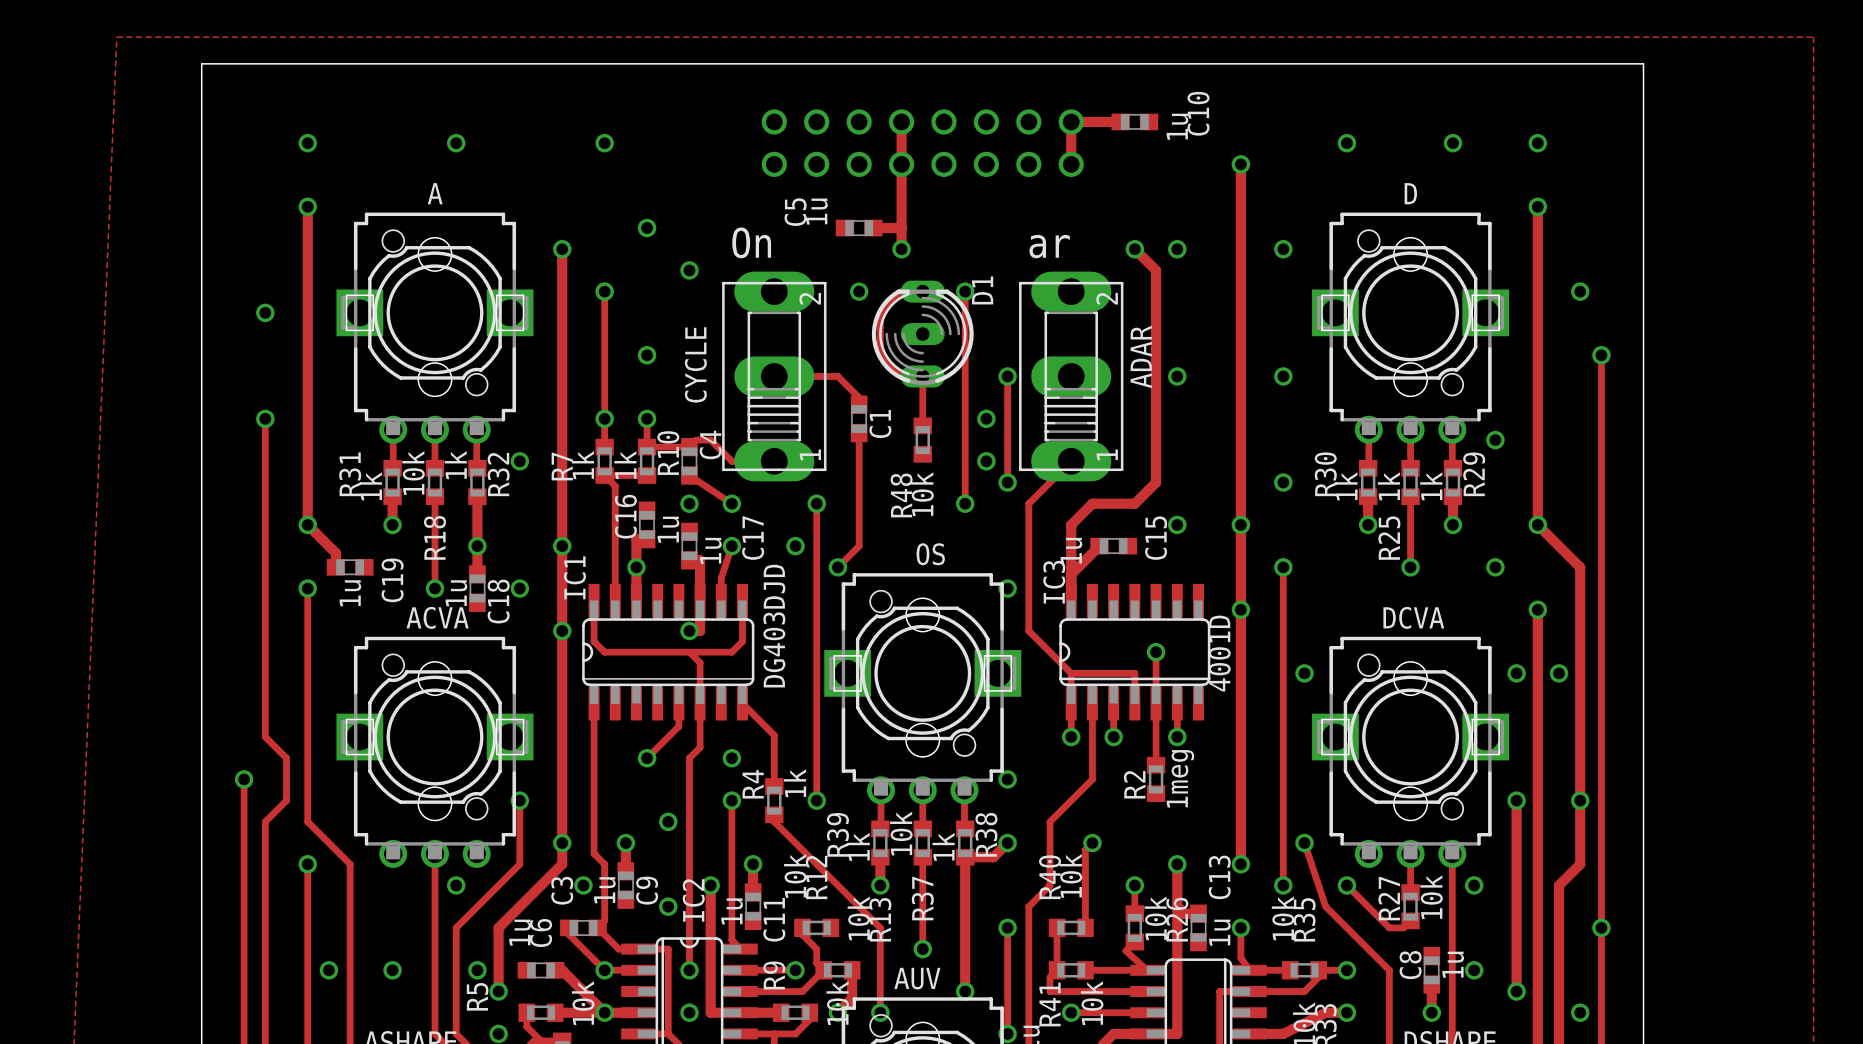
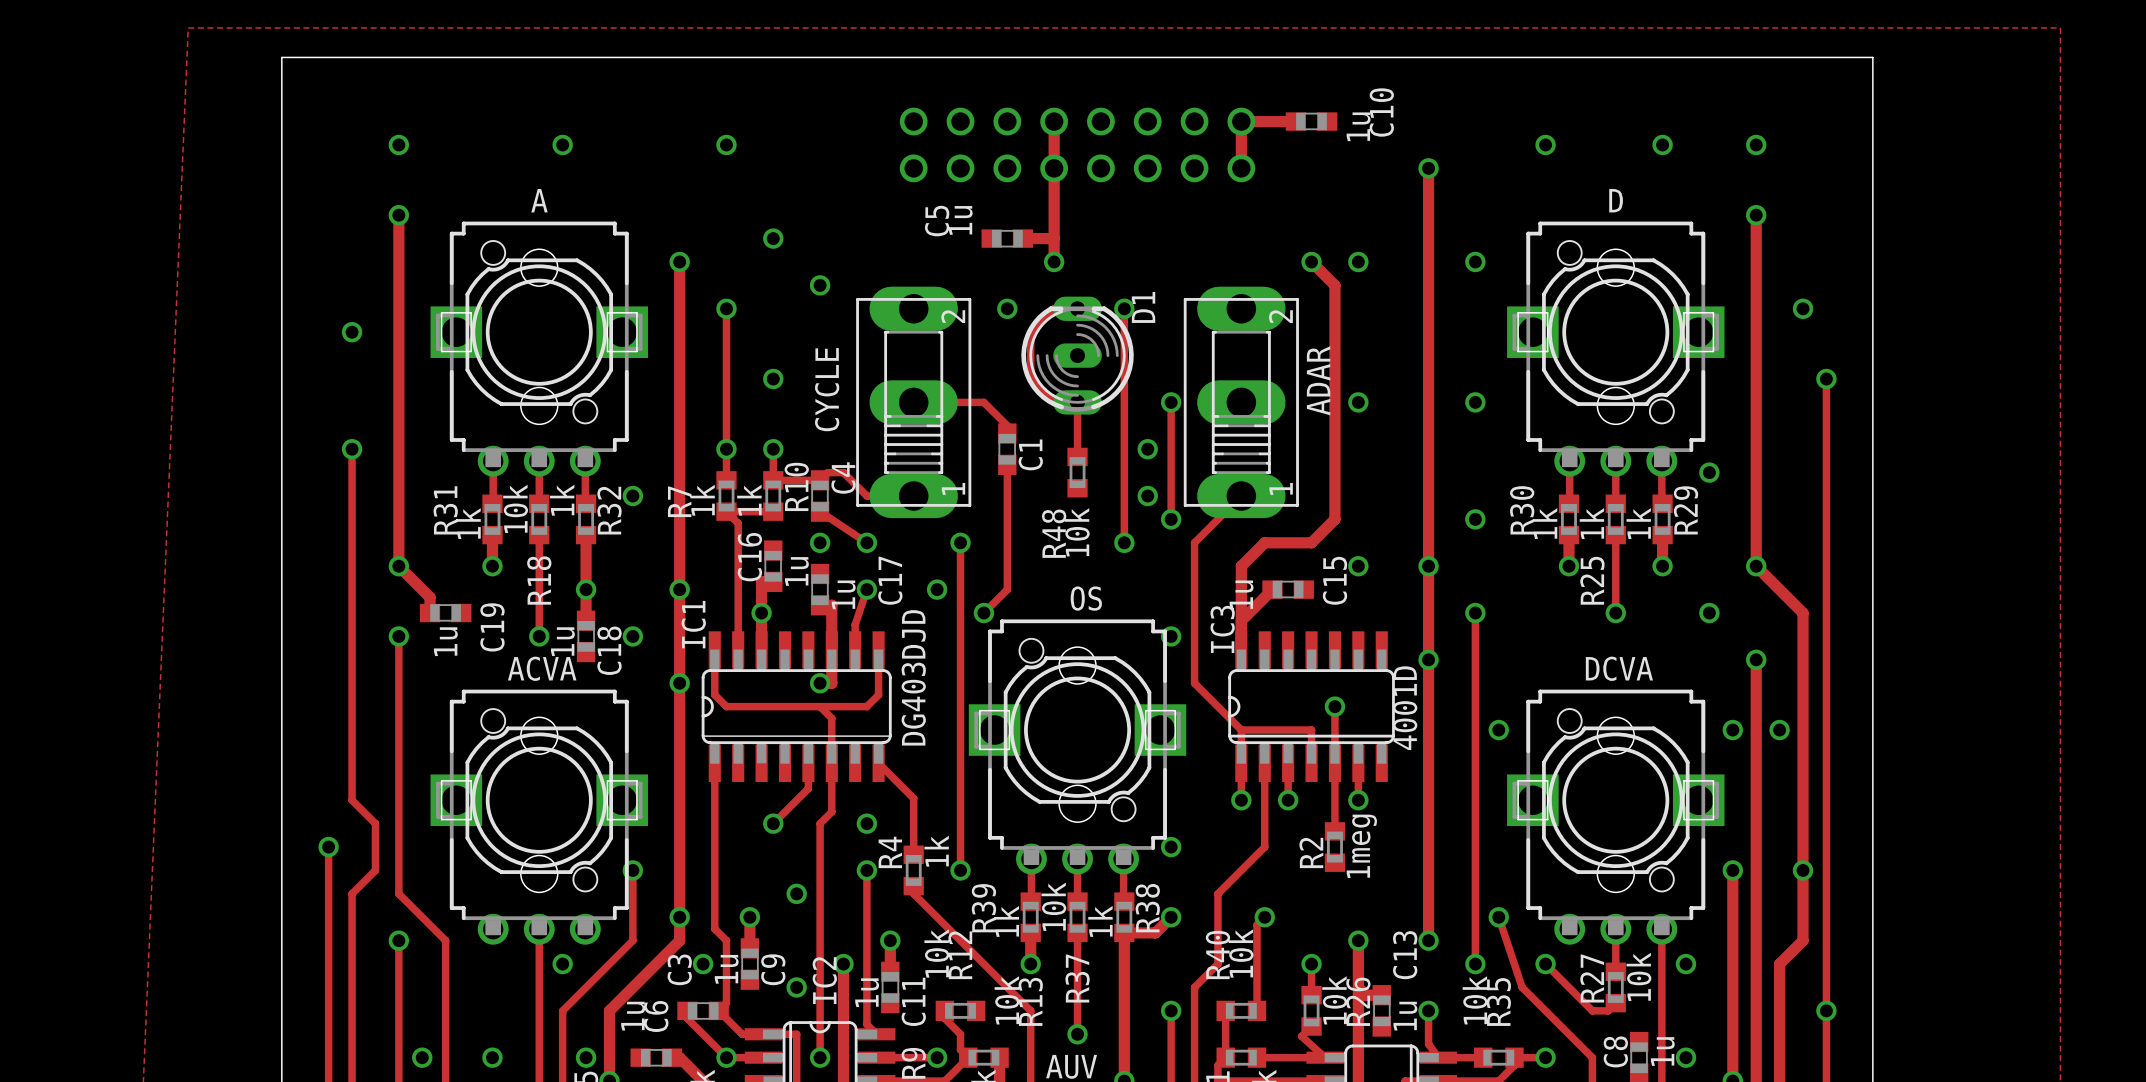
text: On (751, 242) -> none
text: ar (1049, 246) -> none

